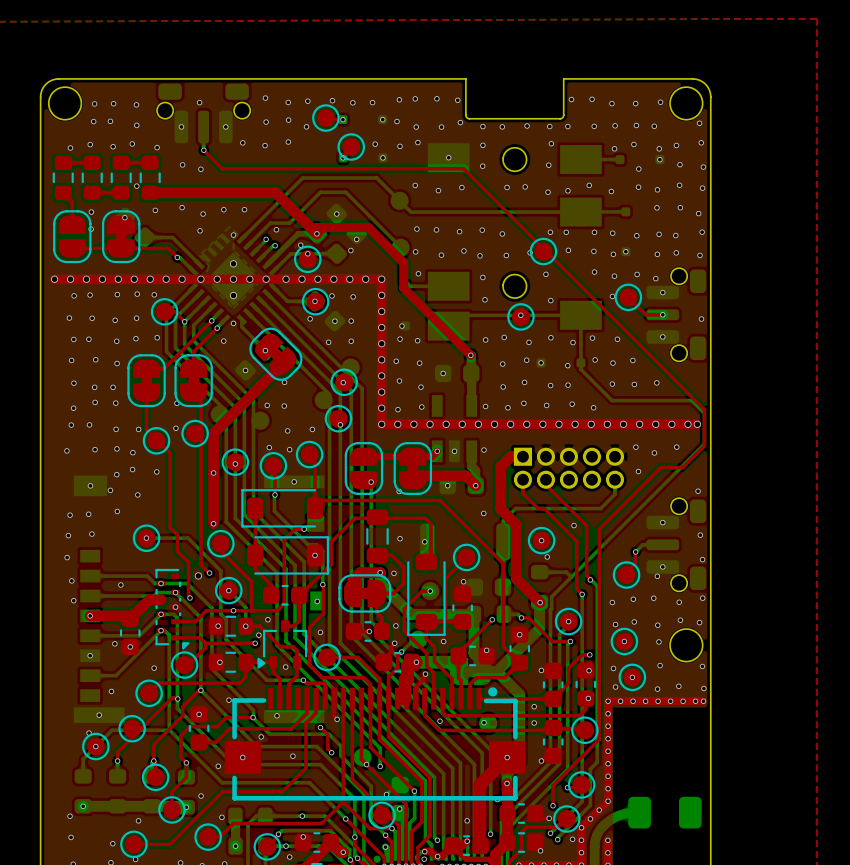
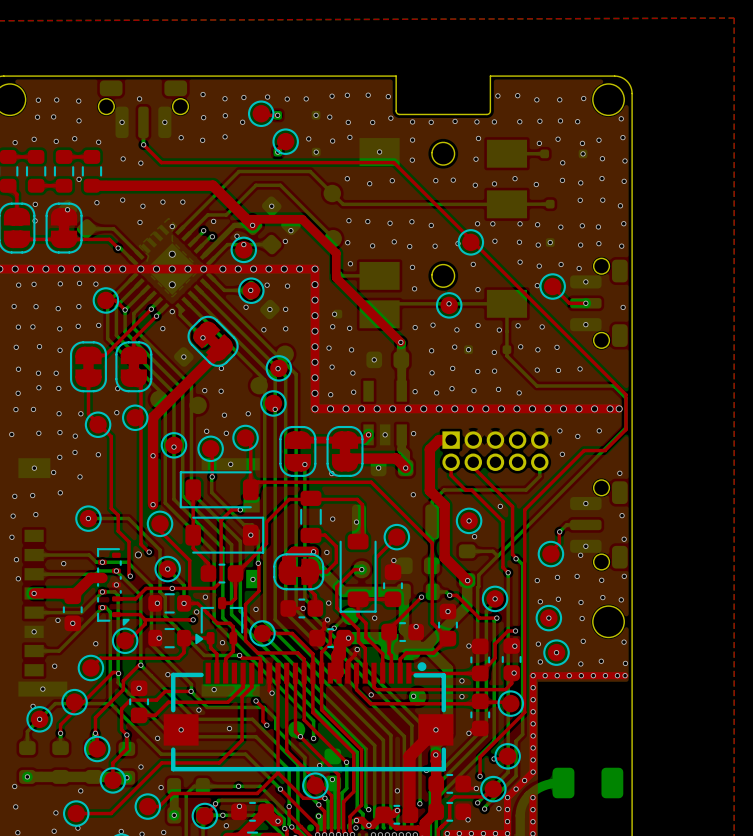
top track: none -> (532, 797) (532, 809)
via: none -> (532, 797)

